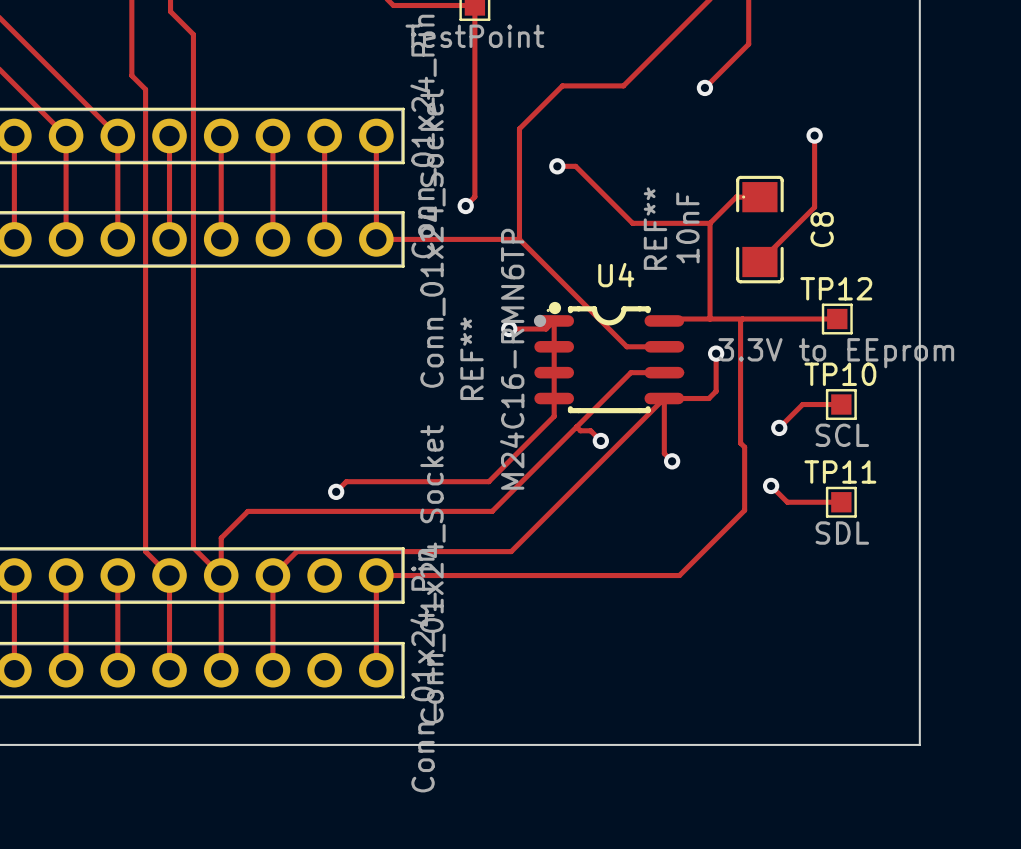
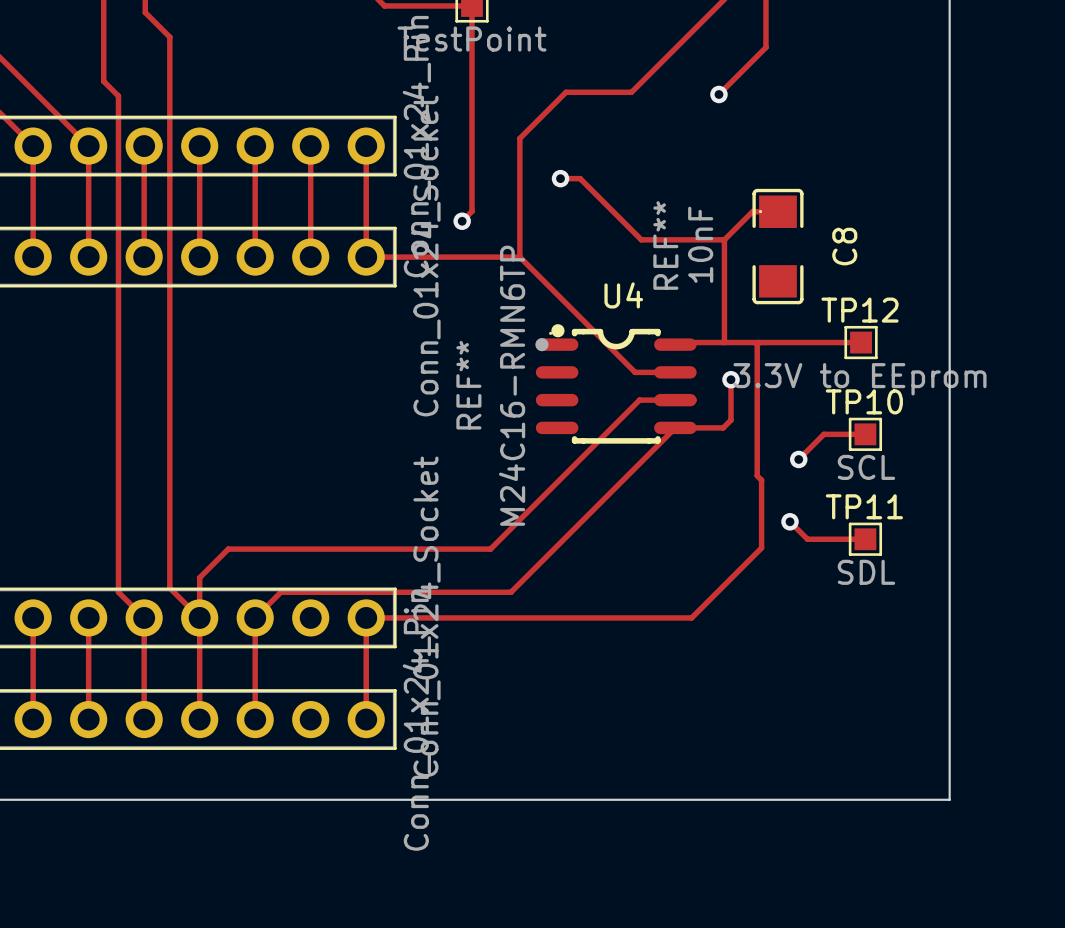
track: (814, 135) (814, 207) (759, 262) -> none
via: (814, 135) -> none
track: (509, 329) (546, 329) (554, 320) (554, 416) (488, 481) (346, 481) (336, 491) -> none
via: (509, 329) -> none
track: (664, 398) (664, 453) (672, 461) -> none
track: (576, 426) (580, 430) (590, 430) (600, 440) -> none
via: (600, 440) -> none
via: (672, 461) -> none
via: (336, 491) -> none

